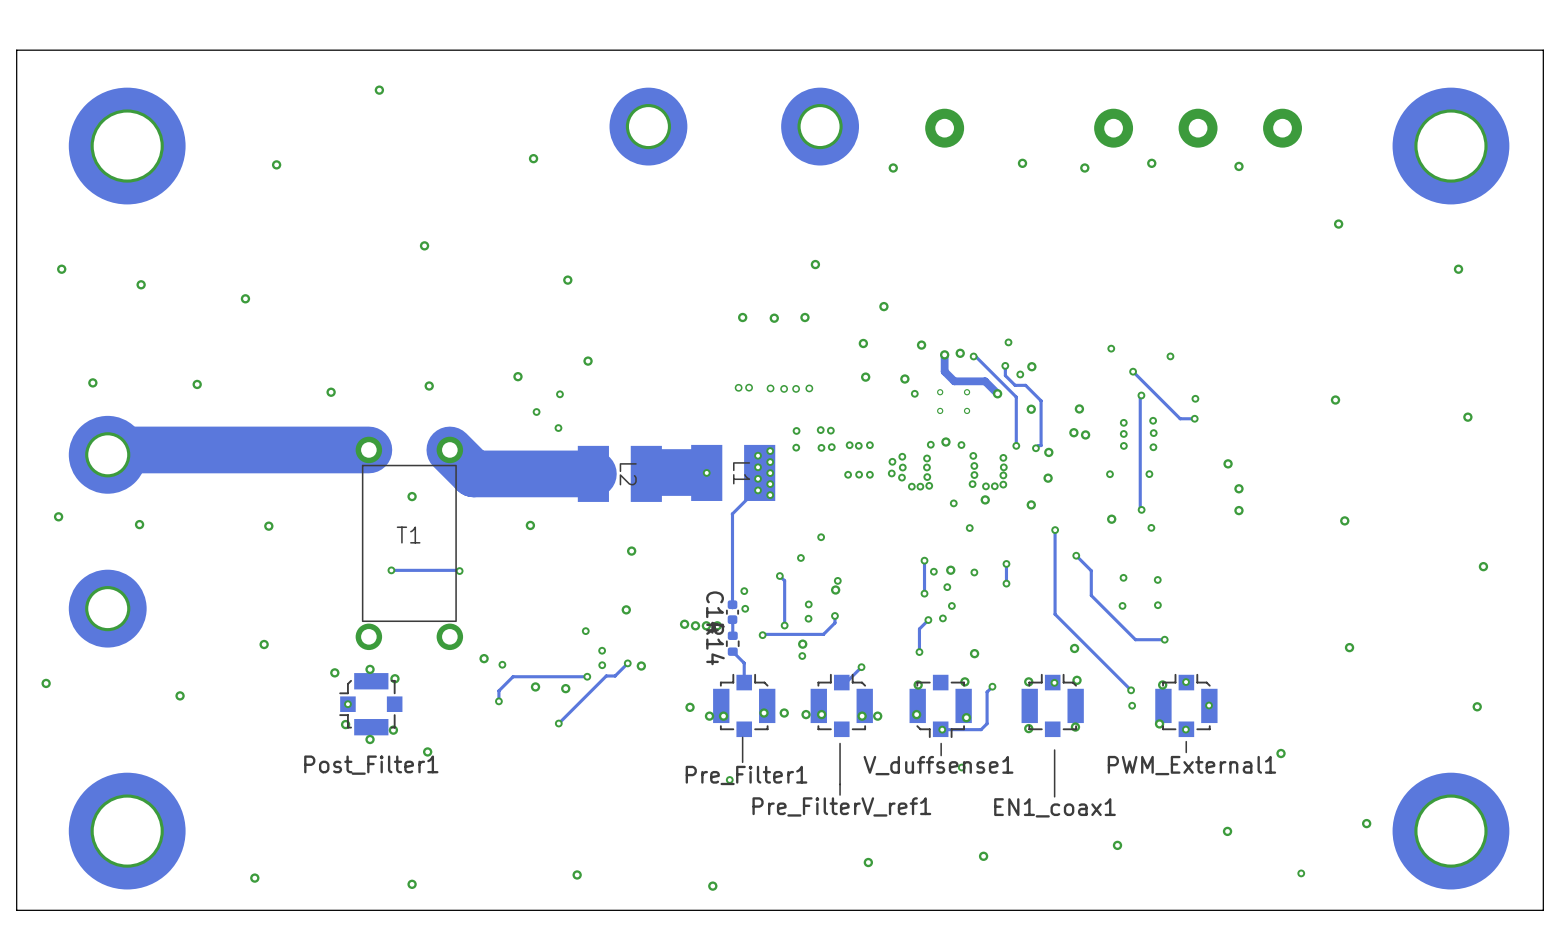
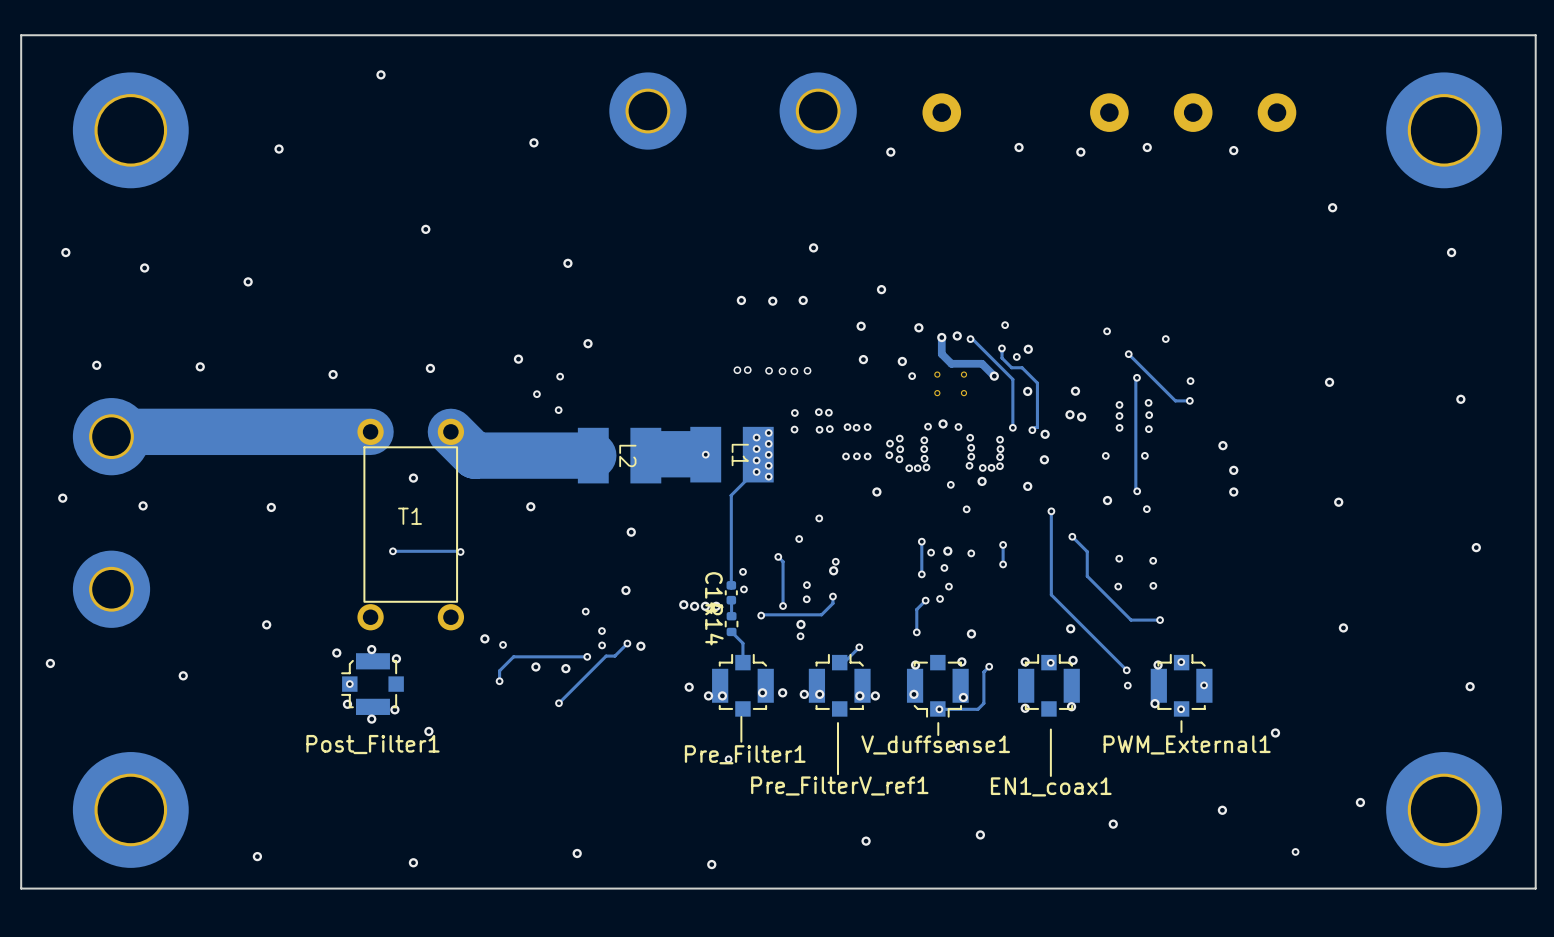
via: none -> (876, 491)

